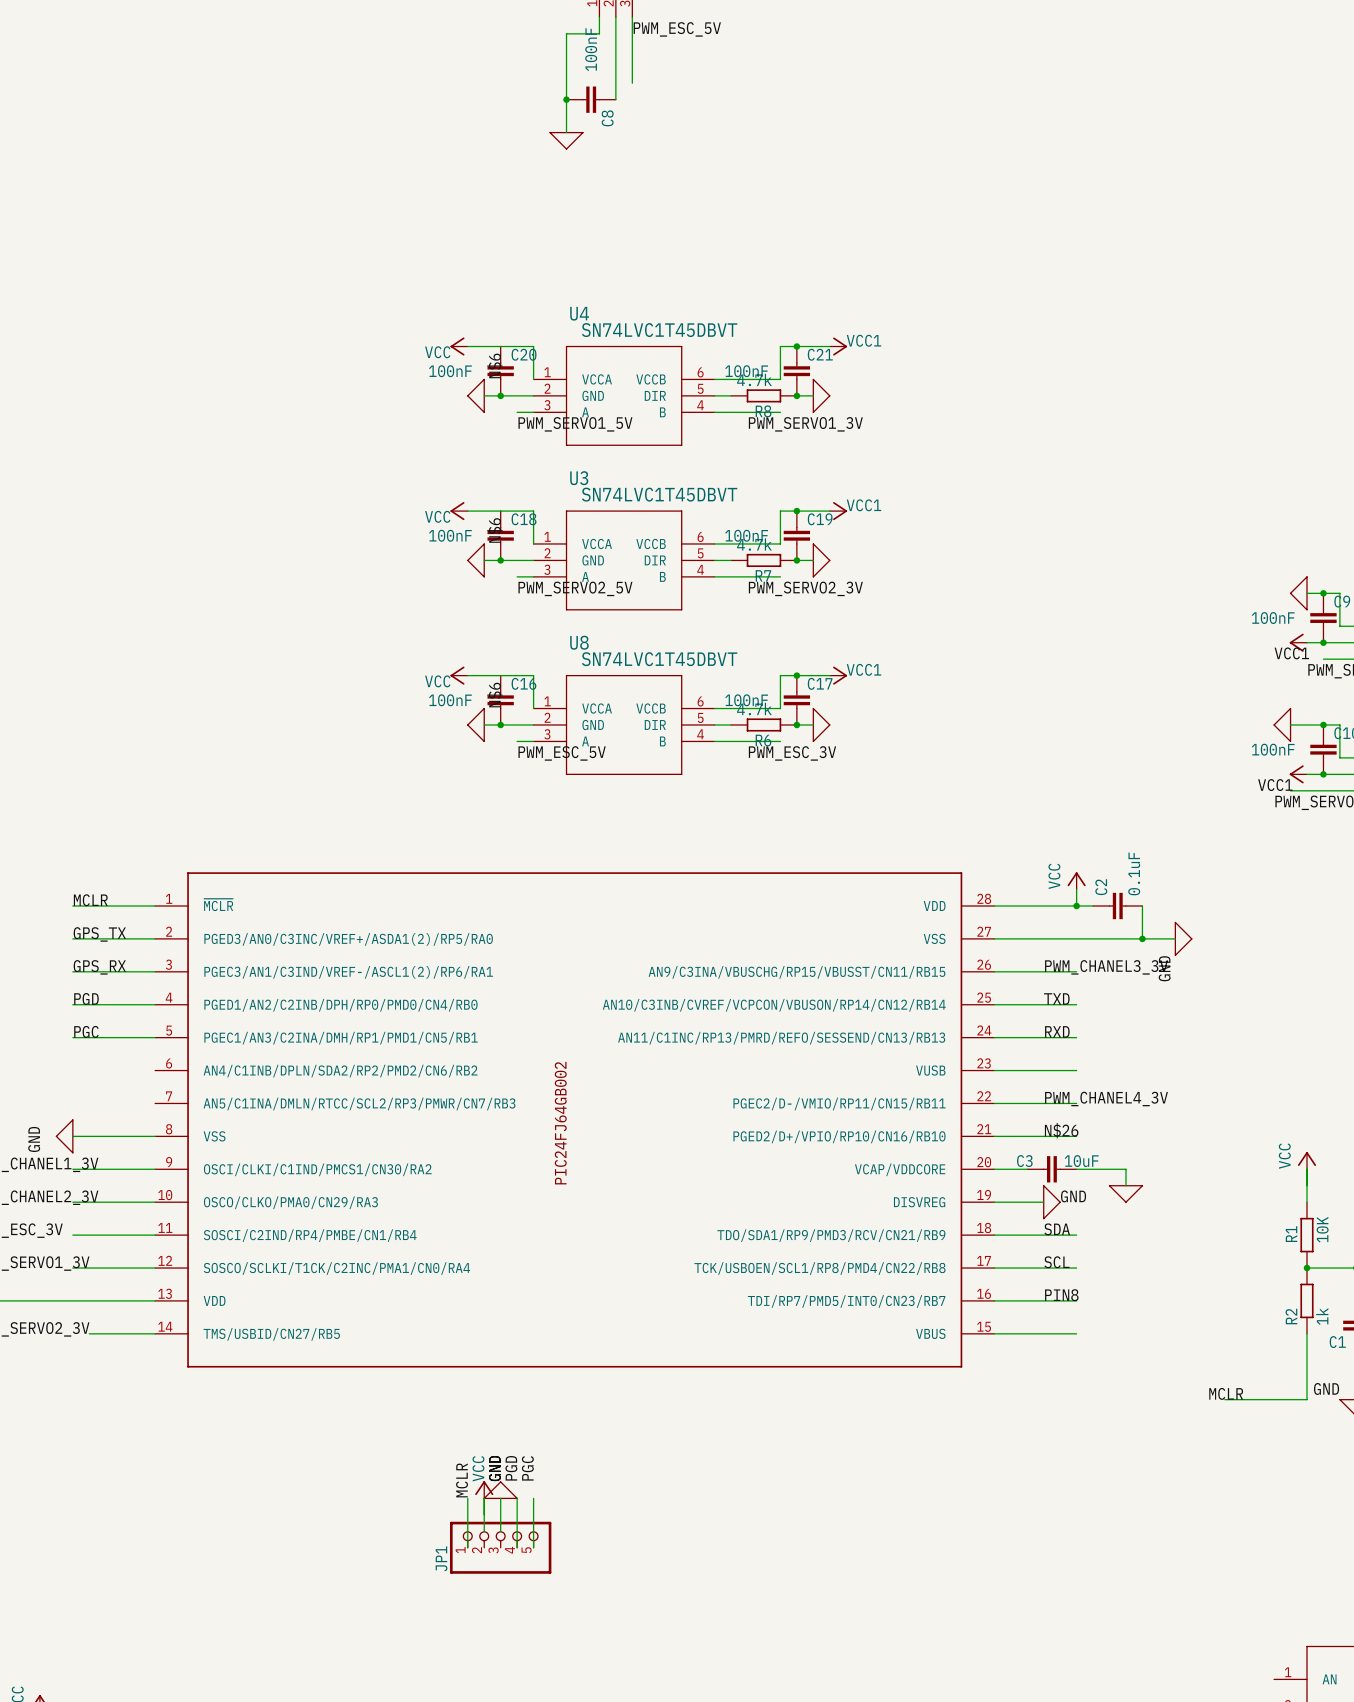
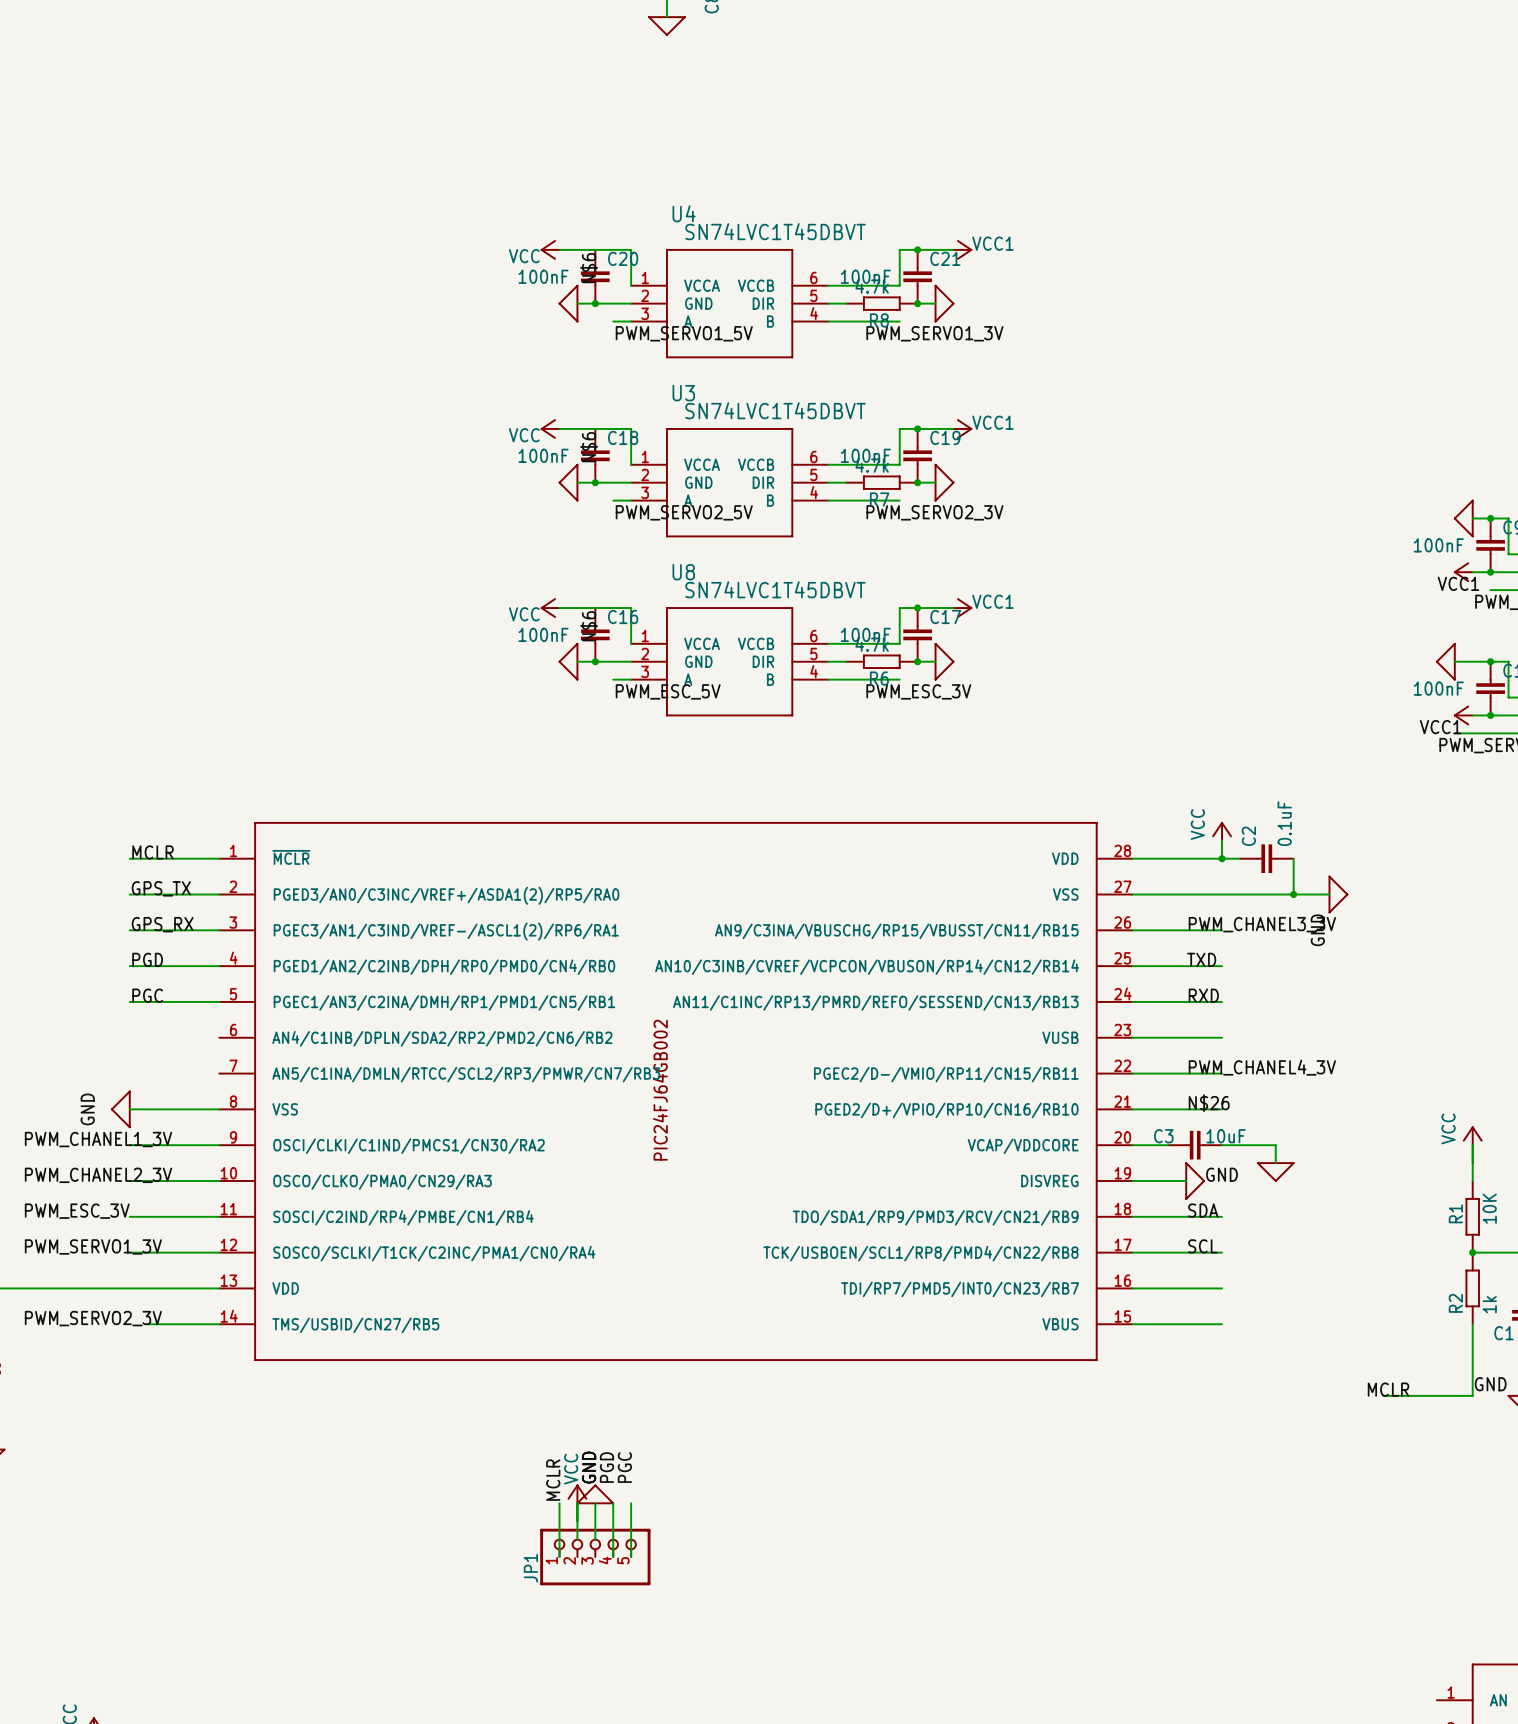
label: PIN8 (1061, 1295) -> none

